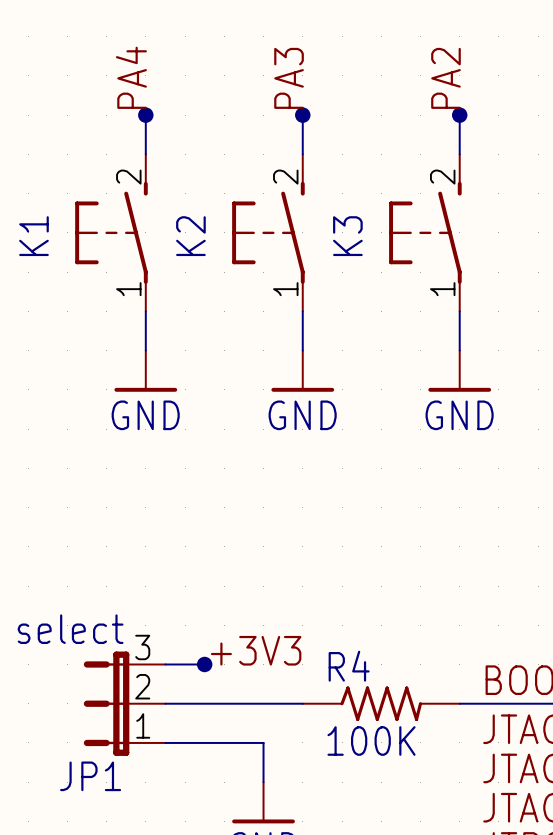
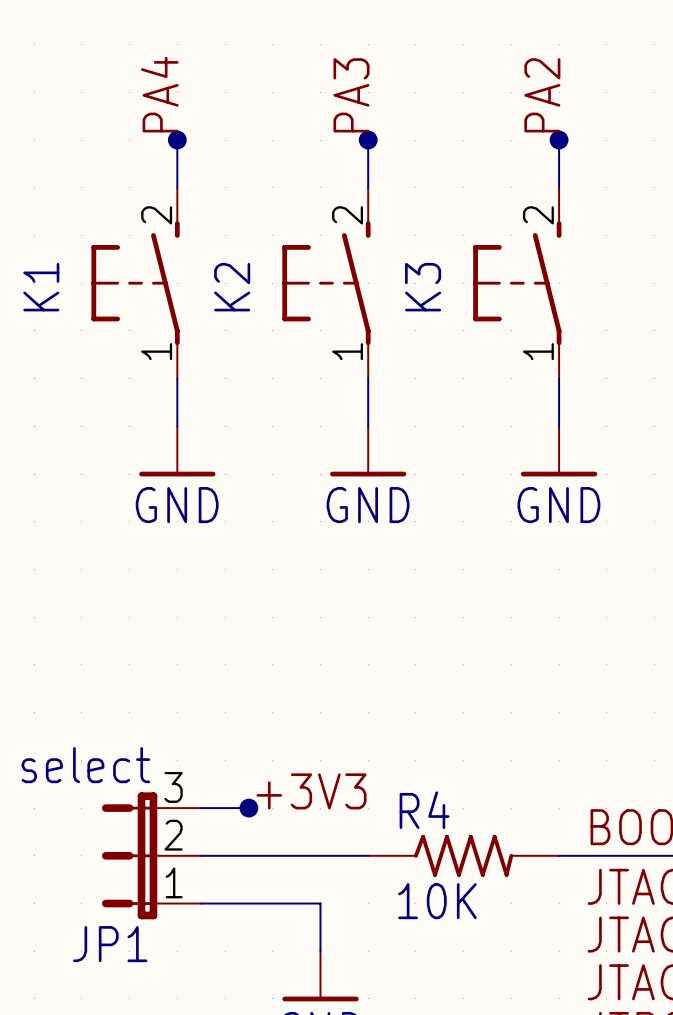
R4 value: 100K (371, 741) -> 10K (437, 901)

